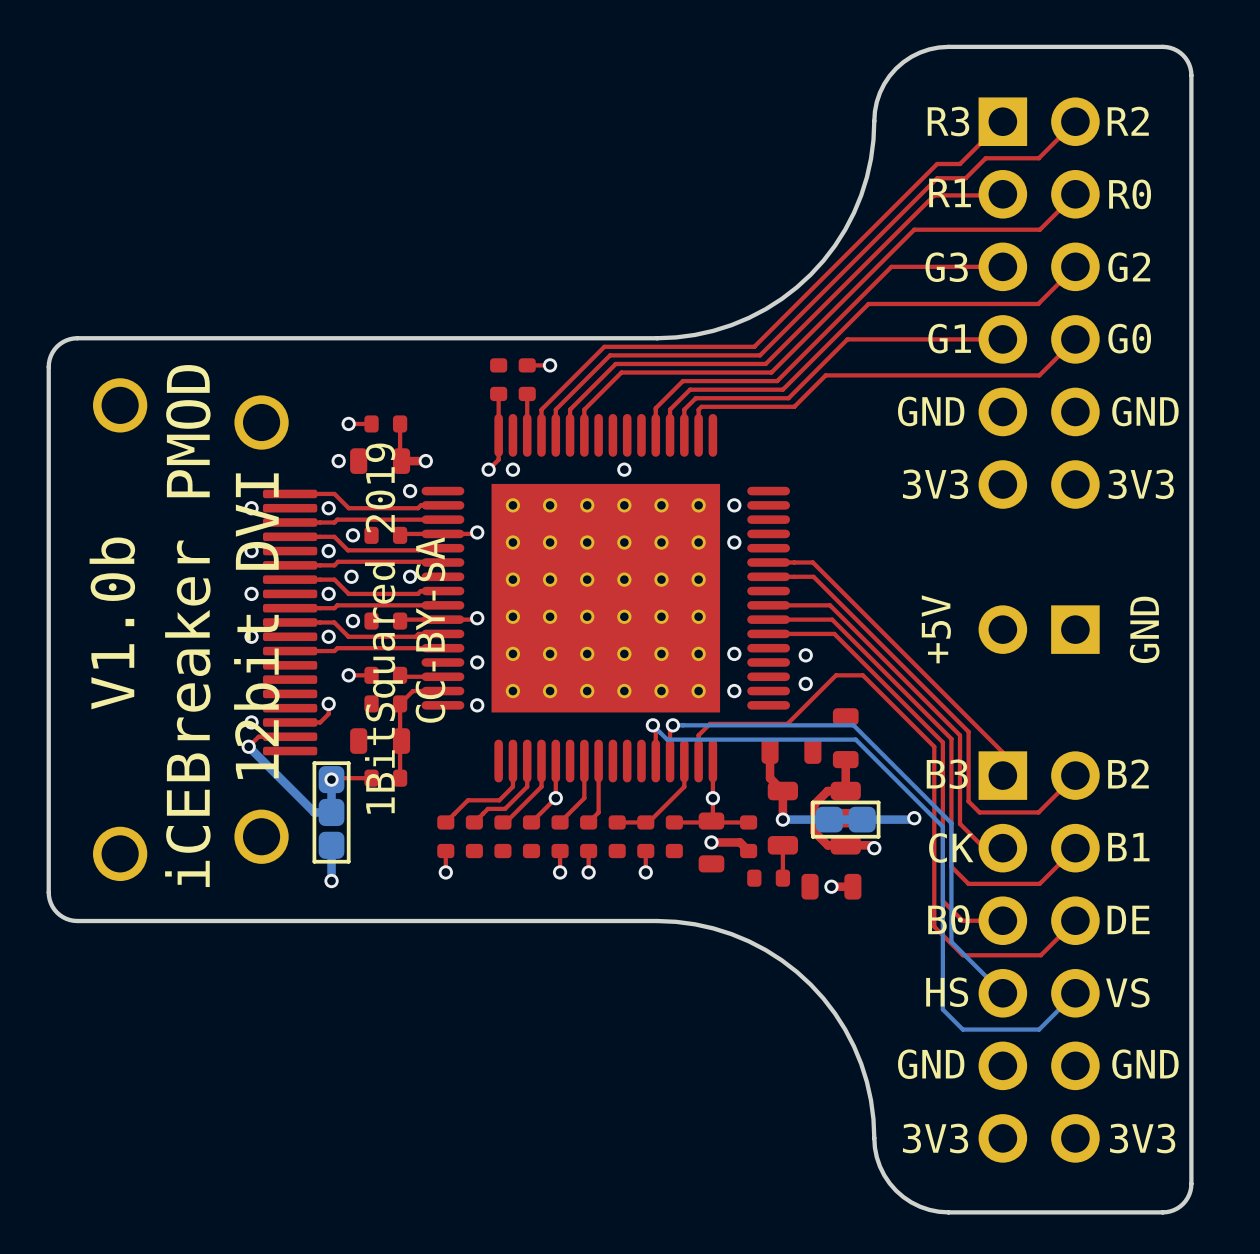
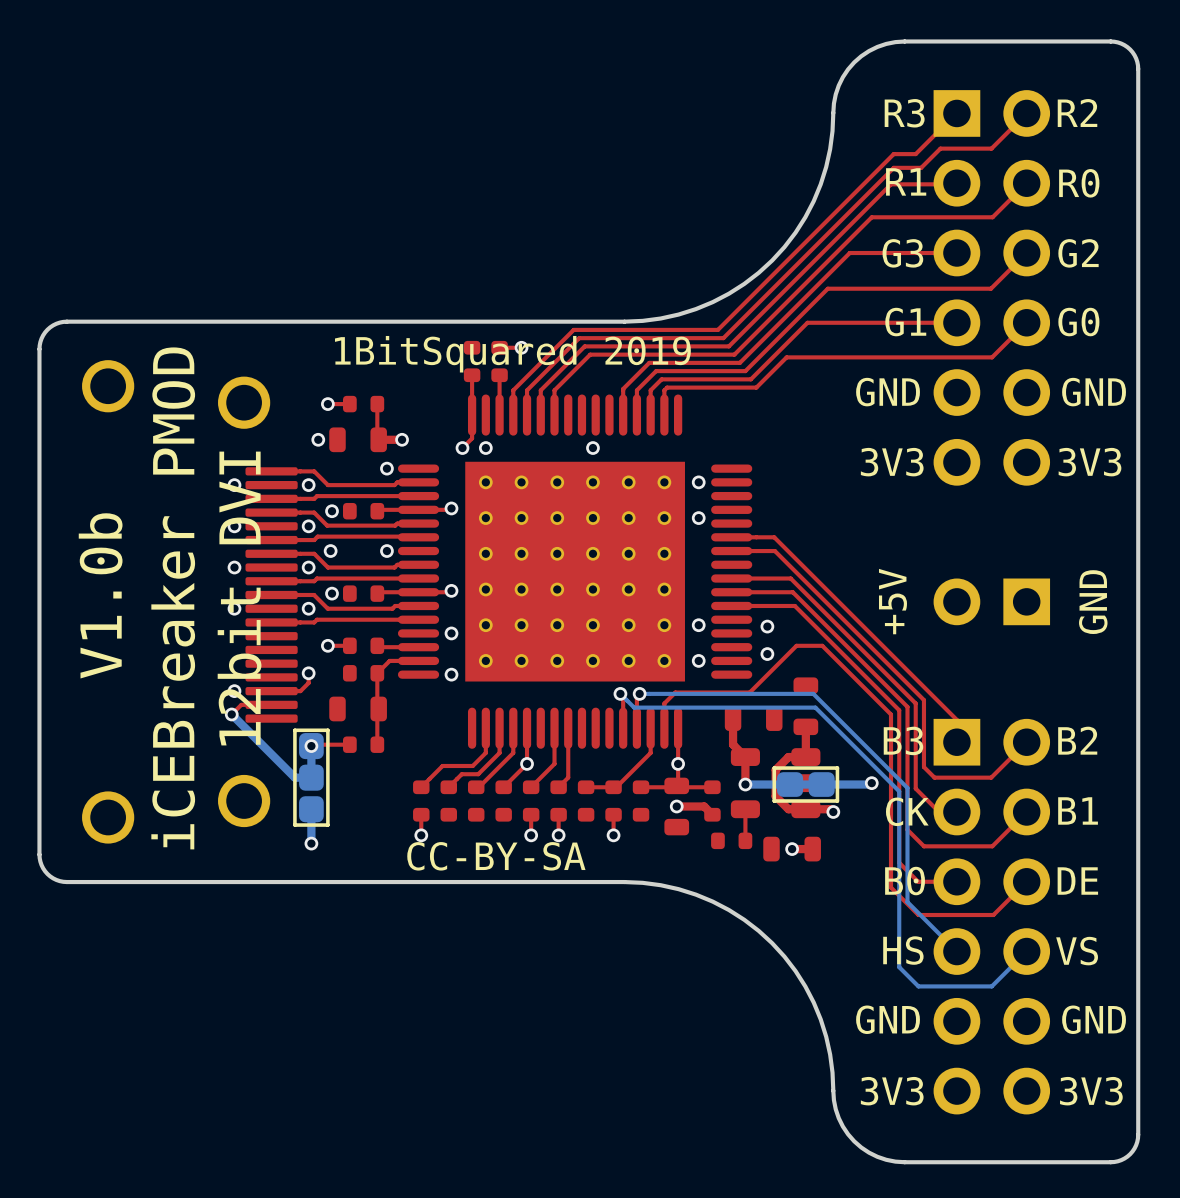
text rotation: 0° (383, 628) -> 90° clockwise (512, 354)
text rotation: 0° (430, 630) -> 90° clockwise (496, 856)
text position: CC-BY-SA (430, 630) -> CC-BY-SA (496, 856)

